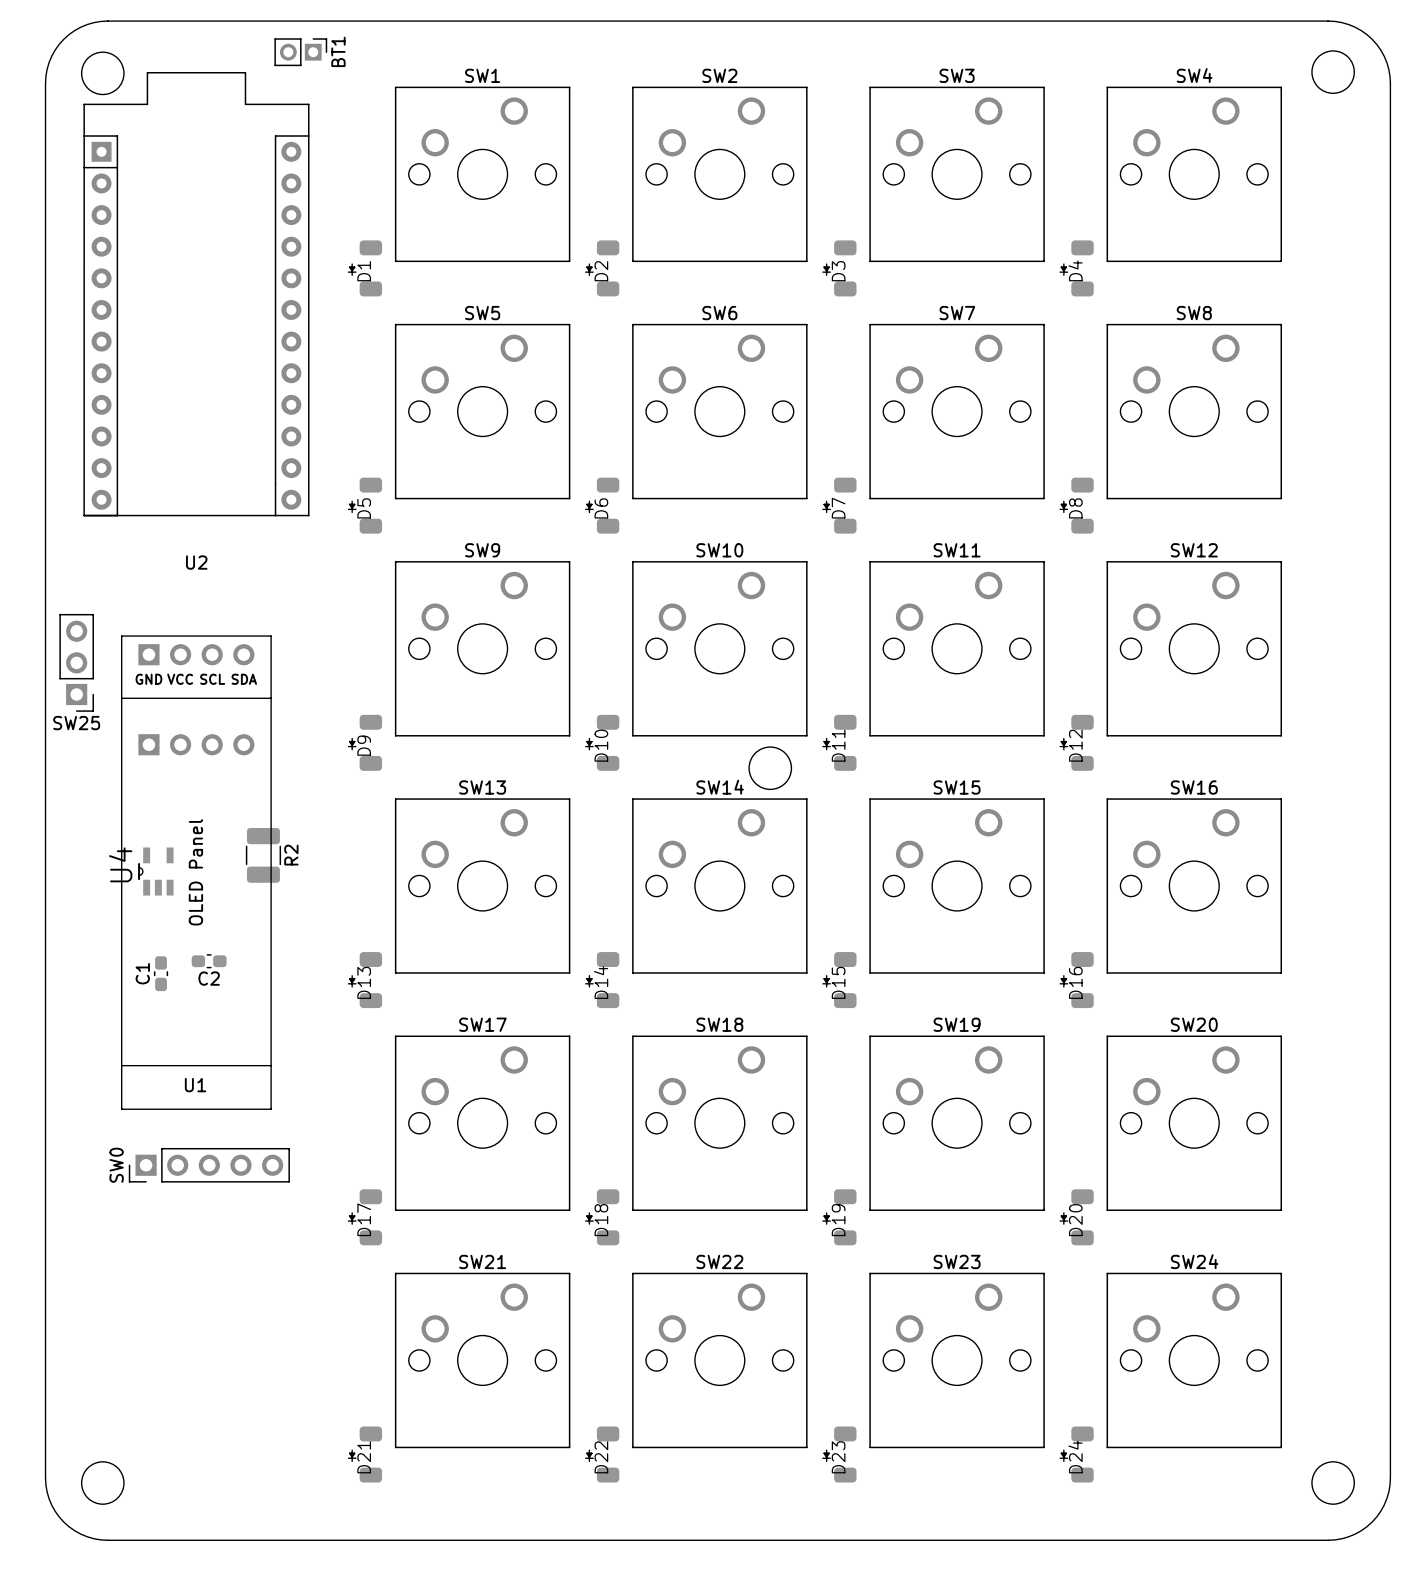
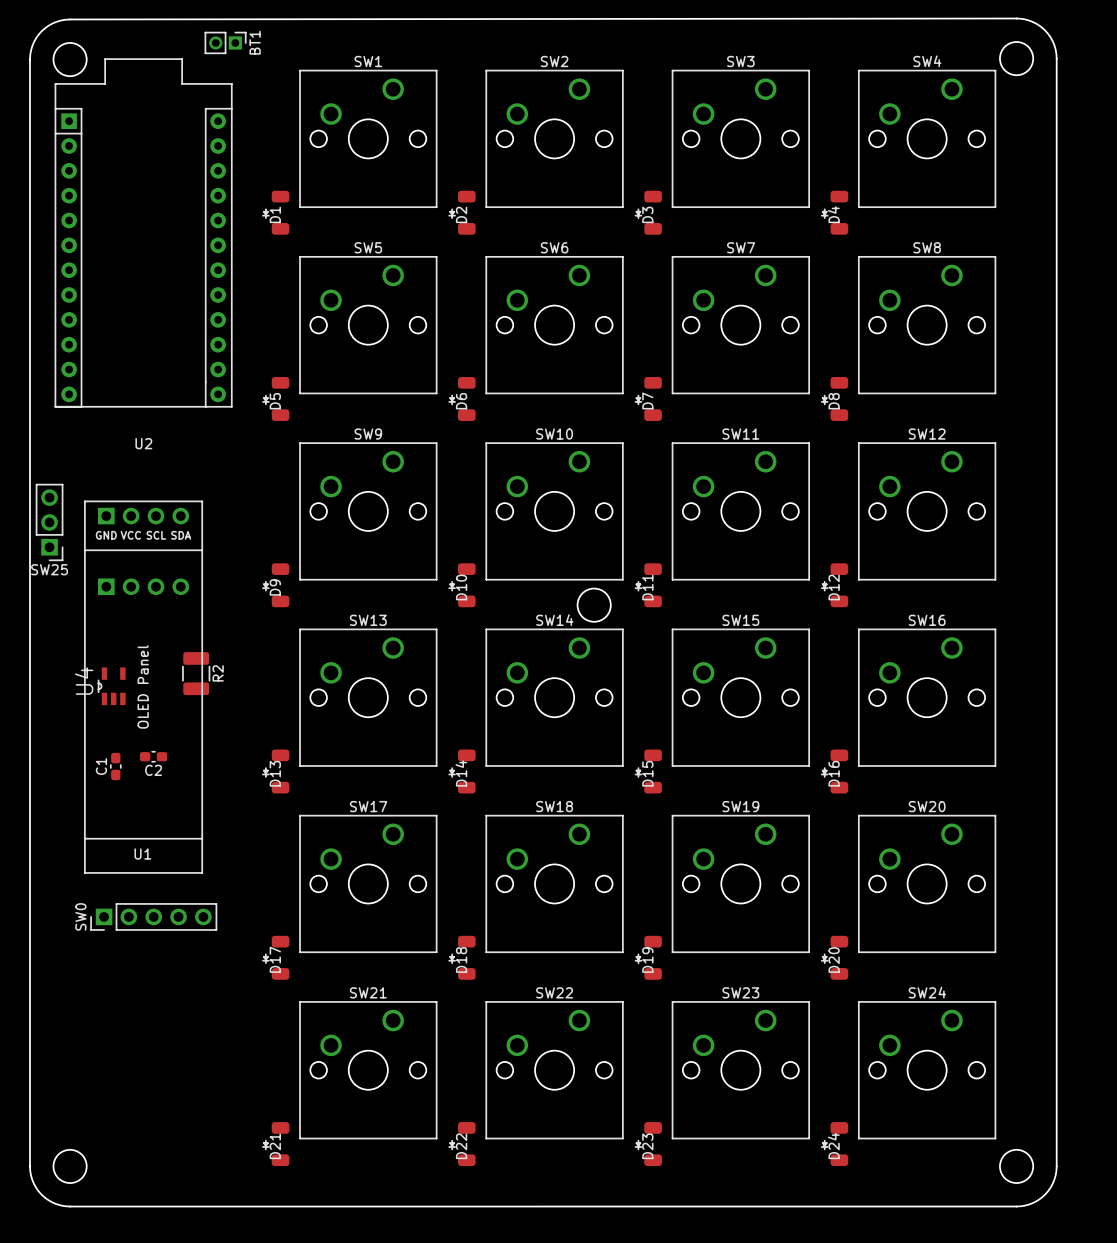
board edge: (107, 21) (1328, 21) (1342, 22) (1355, 27) (1366, 34) (1376, 44) (1386, 62) (1390, 83) (1390, 1478) (1388, 1491) (1384, 1505) (1376, 1516) (1366, 1526) (1348, 1536) (1328, 1540) (107, 1540) (93, 1538) (80, 1534) (68, 1526) (59, 1516) (49, 1498) (45, 1478) (45, 83) (49, 62) (55, 50) (63, 39) (80, 27) (93, 22) (107, 21) -> (1016, 18) (70, 19) (52, 23) (38, 34) (32, 46) (29, 59) (29, 1166) (33, 1183) (45, 1197) (56, 1204) (70, 1206) (1016, 1206) (1033, 1202) (1047, 1191) (1054, 1179) (1056, 1166) (1056, 58) (1054, 45) (1044, 30) (1033, 22) (1016, 18)
round board edge position: (1333, 72) -> (1016, 58)
round board edge position: (1333, 1483) -> (1016, 1166)

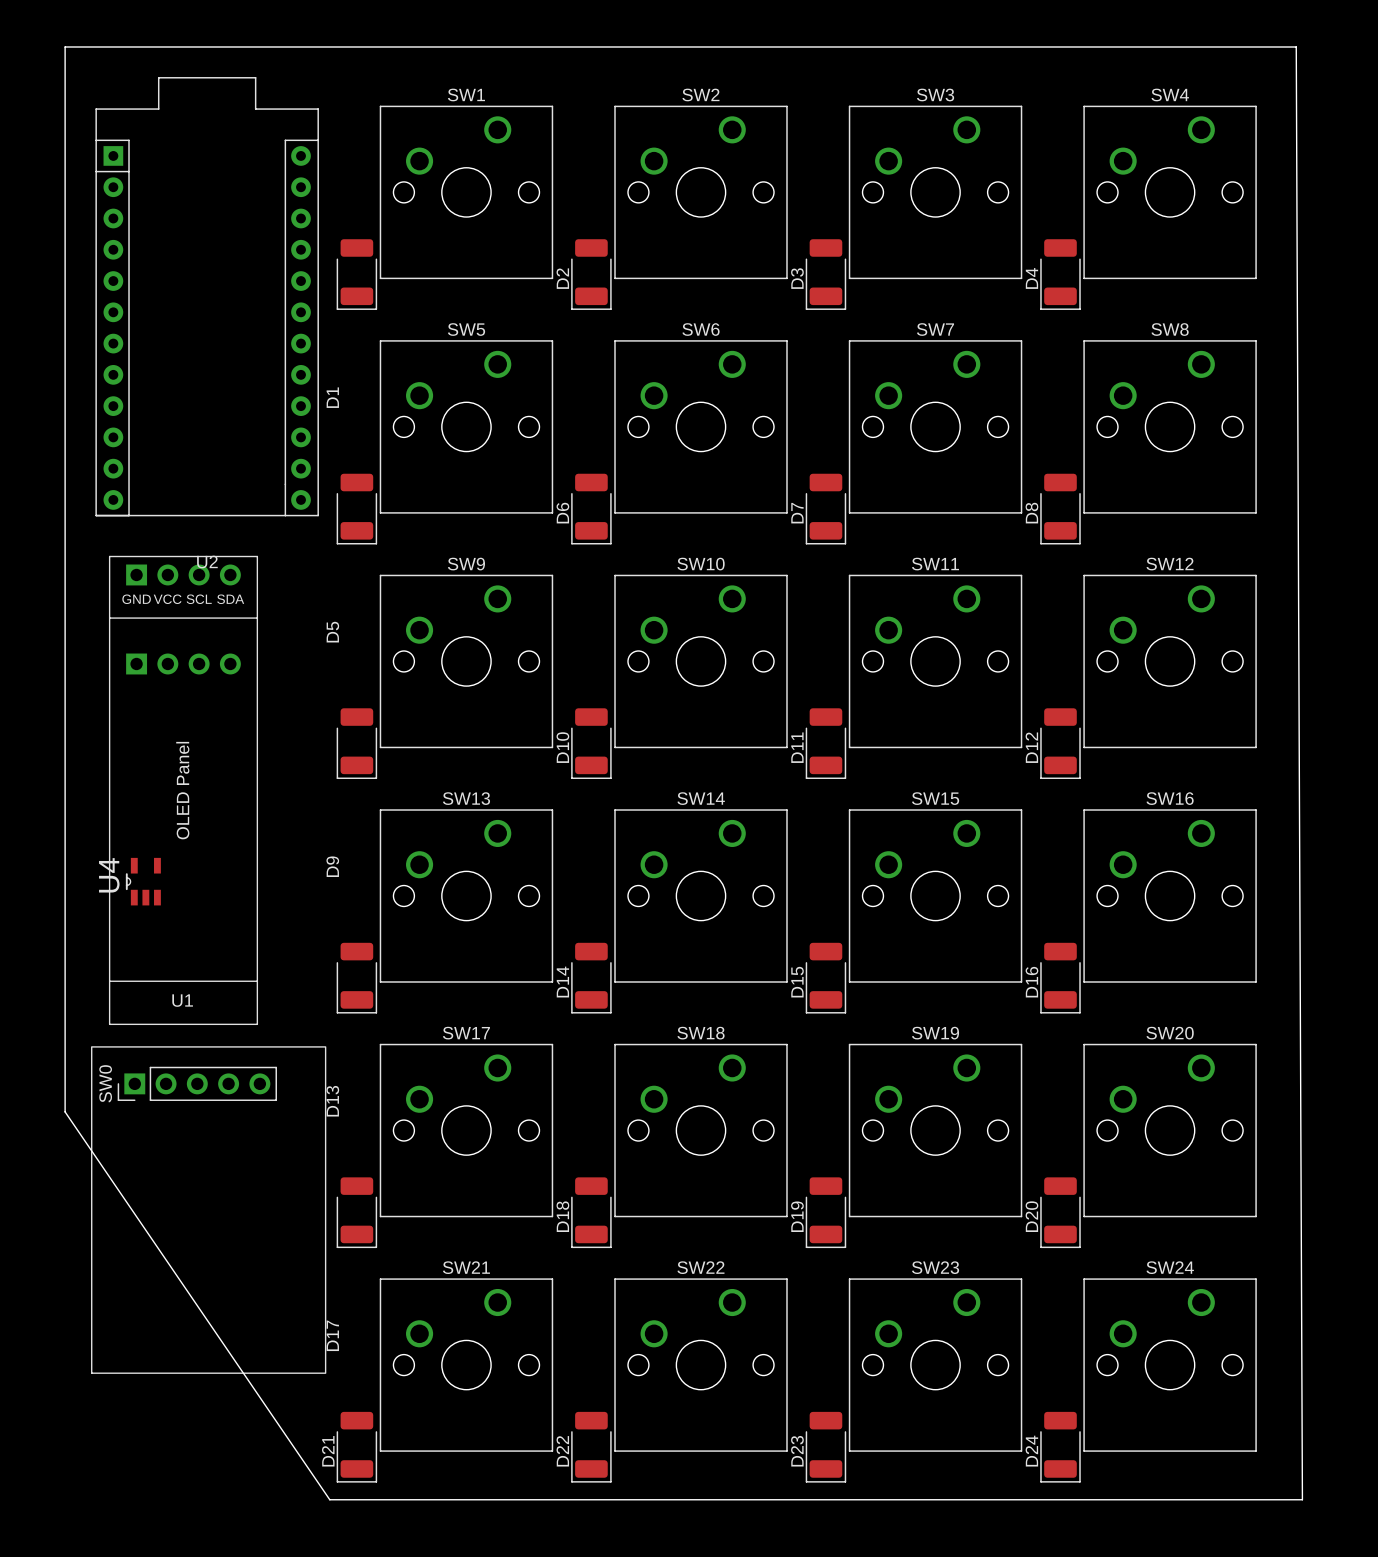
board edge: (1016, 18) (70, 19) (52, 23) (38, 34) (32, 46) (29, 59) (29, 1166) (33, 1183) (45, 1197) (56, 1204) (70, 1206) (1016, 1206) (1033, 1202) (1047, 1191) (1054, 1179) (1056, 1166) (1056, 58) (1054, 45) (1044, 30) (1033, 22) (1016, 18) -> (65, 46) (65, 1111) (329, 1499) (1302, 1499) (1296, 46) (65, 46)
round board edge: [999, 41, 1034, 76] -> none
round board edge: [53, 42, 87, 77] -> none
BT1: (225, 42) -> none
D1 footprint: [262, 190, 290, 235] -> [336, 239, 378, 310]
D2 footprint: [448, 190, 476, 235] -> [571, 239, 612, 310]
D3 footprint: [635, 190, 662, 235] -> [805, 239, 847, 310]
D4 footprint: [821, 190, 849, 235] -> [1040, 239, 1081, 310]
D1 name position: D1 (275, 214) -> D1 (332, 397)
D2 name position: D2 (461, 214) -> D2 (562, 278)
D3 name position: D3 (647, 214) -> D3 (797, 278)
D4 name position: D4 (833, 214) -> D4 (1031, 278)
U2 position: (143, 232) -> (207, 296)
D5 footprint: [262, 376, 290, 421] -> [336, 473, 378, 545]
D6 footprint: [448, 376, 476, 421] -> [571, 473, 612, 545]
D7 footprint: [635, 376, 662, 421] -> [805, 473, 847, 545]
D8 footprint: [821, 376, 849, 421] -> [1040, 473, 1081, 545]
D7 name position: D7 (647, 400) -> D7 (797, 513)
D5 name position: D5 (275, 401) -> D5 (332, 632)
D6 name position: D6 (461, 401) -> D6 (562, 513)
D8 name position: D8 (834, 401) -> D8 (1031, 513)
SW25: (49, 522) -> none
D9 footprint: [262, 563, 290, 608] -> [336, 708, 378, 780]
D10 footprint: [448, 563, 476, 608] -> [571, 708, 612, 780]
D11 footprint: [635, 563, 662, 608] -> [805, 708, 847, 780]
D12 footprint: [821, 563, 849, 608] -> [1040, 708, 1081, 780]
part position: (143, 586) -> (183, 663)
D9 name position: D9 (275, 587) -> D9 (332, 866)
D10 name position: D10 (461, 587) -> D10 (562, 747)
D11 name position: D11 (647, 587) -> D11 (797, 747)
D12 name position: D12 (834, 587) -> D12 (1031, 747)
round board edge: [577, 588, 612, 623] -> none
R2: (196, 673) -> none
U1 position: (143, 687) -> (183, 790)
D13 footprint: [262, 749, 290, 794] -> [336, 942, 378, 1014]
D14 footprint: [448, 749, 476, 794] -> [571, 942, 612, 1014]
D15 footprint: [635, 749, 662, 794] -> [805, 942, 847, 1014]
D16 footprint: [821, 749, 849, 794] -> [1040, 942, 1081, 1014]
C2: (153, 756) -> none
C1: (115, 766) -> none
D13 name position: D13 (275, 773) -> D13 (332, 1101)
D14 name position: D14 (461, 773) -> D14 (562, 982)
D15 name position: D15 (647, 773) -> D15 (797, 982)
D16 name position: D16 (834, 773) -> D16 (1031, 982)
SW0 footprint: [90, 903, 218, 931] -> [91, 1046, 327, 1374]
SW0 name position: SW0 (80, 916) -> SW0 (105, 1083)
D17 footprint: [262, 935, 290, 980] -> [336, 1177, 378, 1249]
D18 footprint: [448, 935, 476, 980] -> [571, 1177, 612, 1249]
D19 footprint: [635, 935, 662, 980] -> [805, 1177, 847, 1249]
D20 footprint: [821, 935, 849, 980] -> [1040, 1177, 1081, 1249]
D17 name position: D17 (275, 959) -> D17 (332, 1335)
D18 name position: D18 (461, 960) -> D18 (562, 1216)
D19 name position: D19 (647, 960) -> D19 (797, 1216)
D20 name position: D20 (834, 960) -> D20 (1031, 1216)
D21 footprint: [262, 1122, 290, 1167] -> [336, 1411, 378, 1483]
D22 footprint: [448, 1122, 476, 1167] -> [571, 1411, 612, 1483]
D23 footprint: [635, 1122, 662, 1167] -> [805, 1411, 847, 1483]
D24 footprint: [821, 1122, 849, 1167] -> [1040, 1411, 1081, 1483]
D21 name position: D21 (275, 1146) -> D21 (328, 1451)
D22 name position: D22 (461, 1146) -> D22 (562, 1451)
D23 name position: D23 (647, 1146) -> D23 (797, 1451)
D24 name position: D24 (833, 1146) -> D24 (1031, 1451)
round board edge: [53, 1149, 87, 1184] -> none
round board edge: [999, 1149, 1034, 1184] -> none

